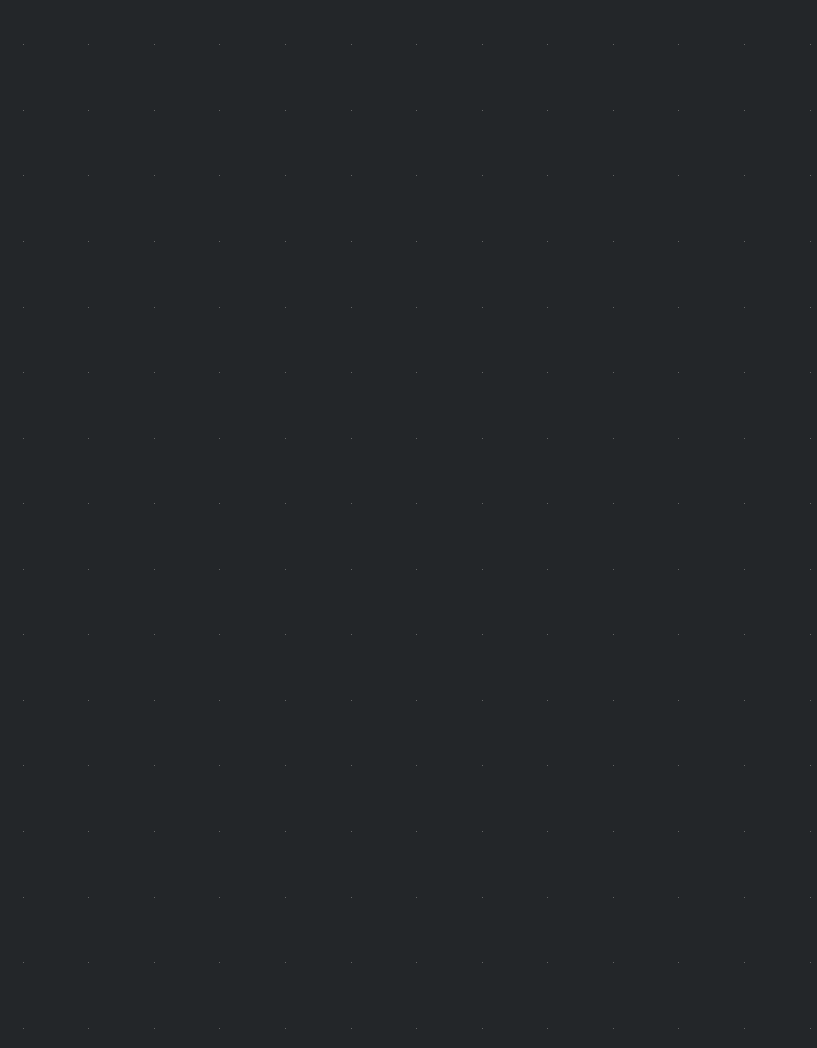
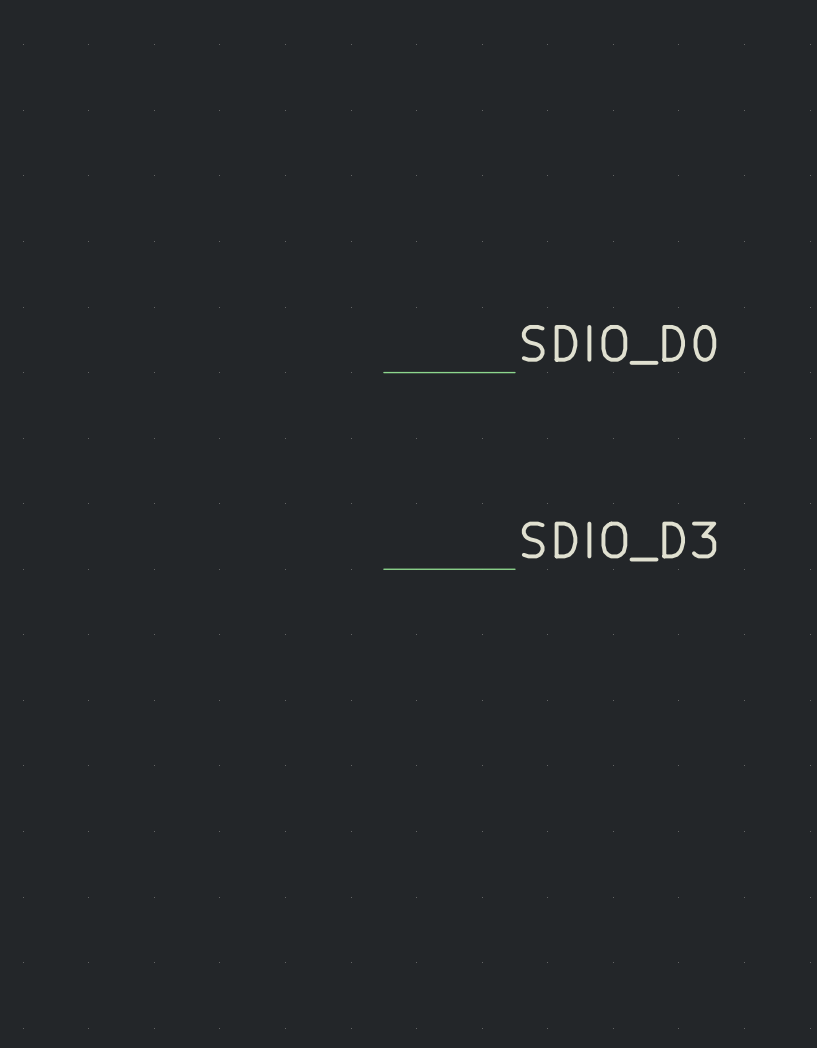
label: none -> SDIO_D0 (619, 344)
wire: none -> (383, 372) (515, 372)
label: none -> SDIO_D3 (619, 541)
wire: none -> (383, 569) (515, 569)

